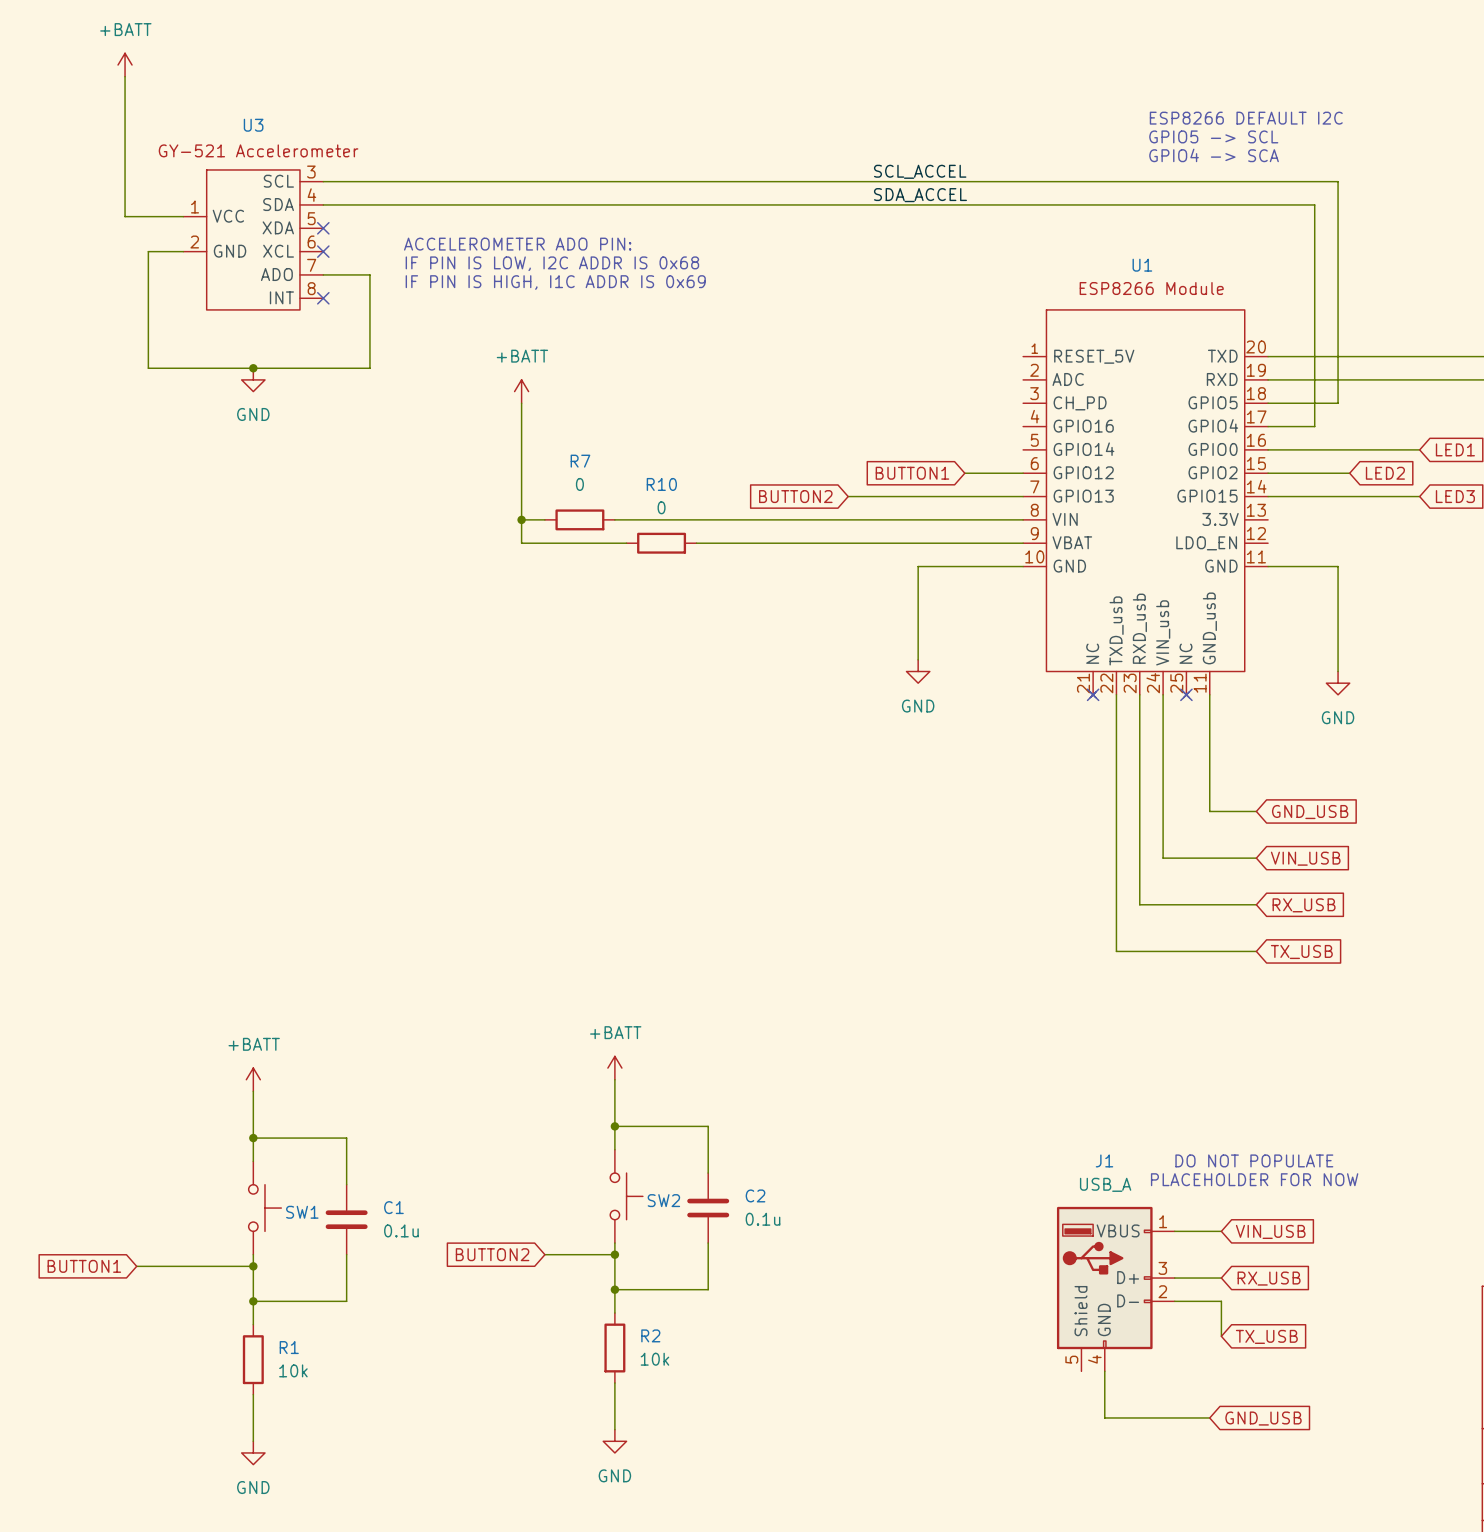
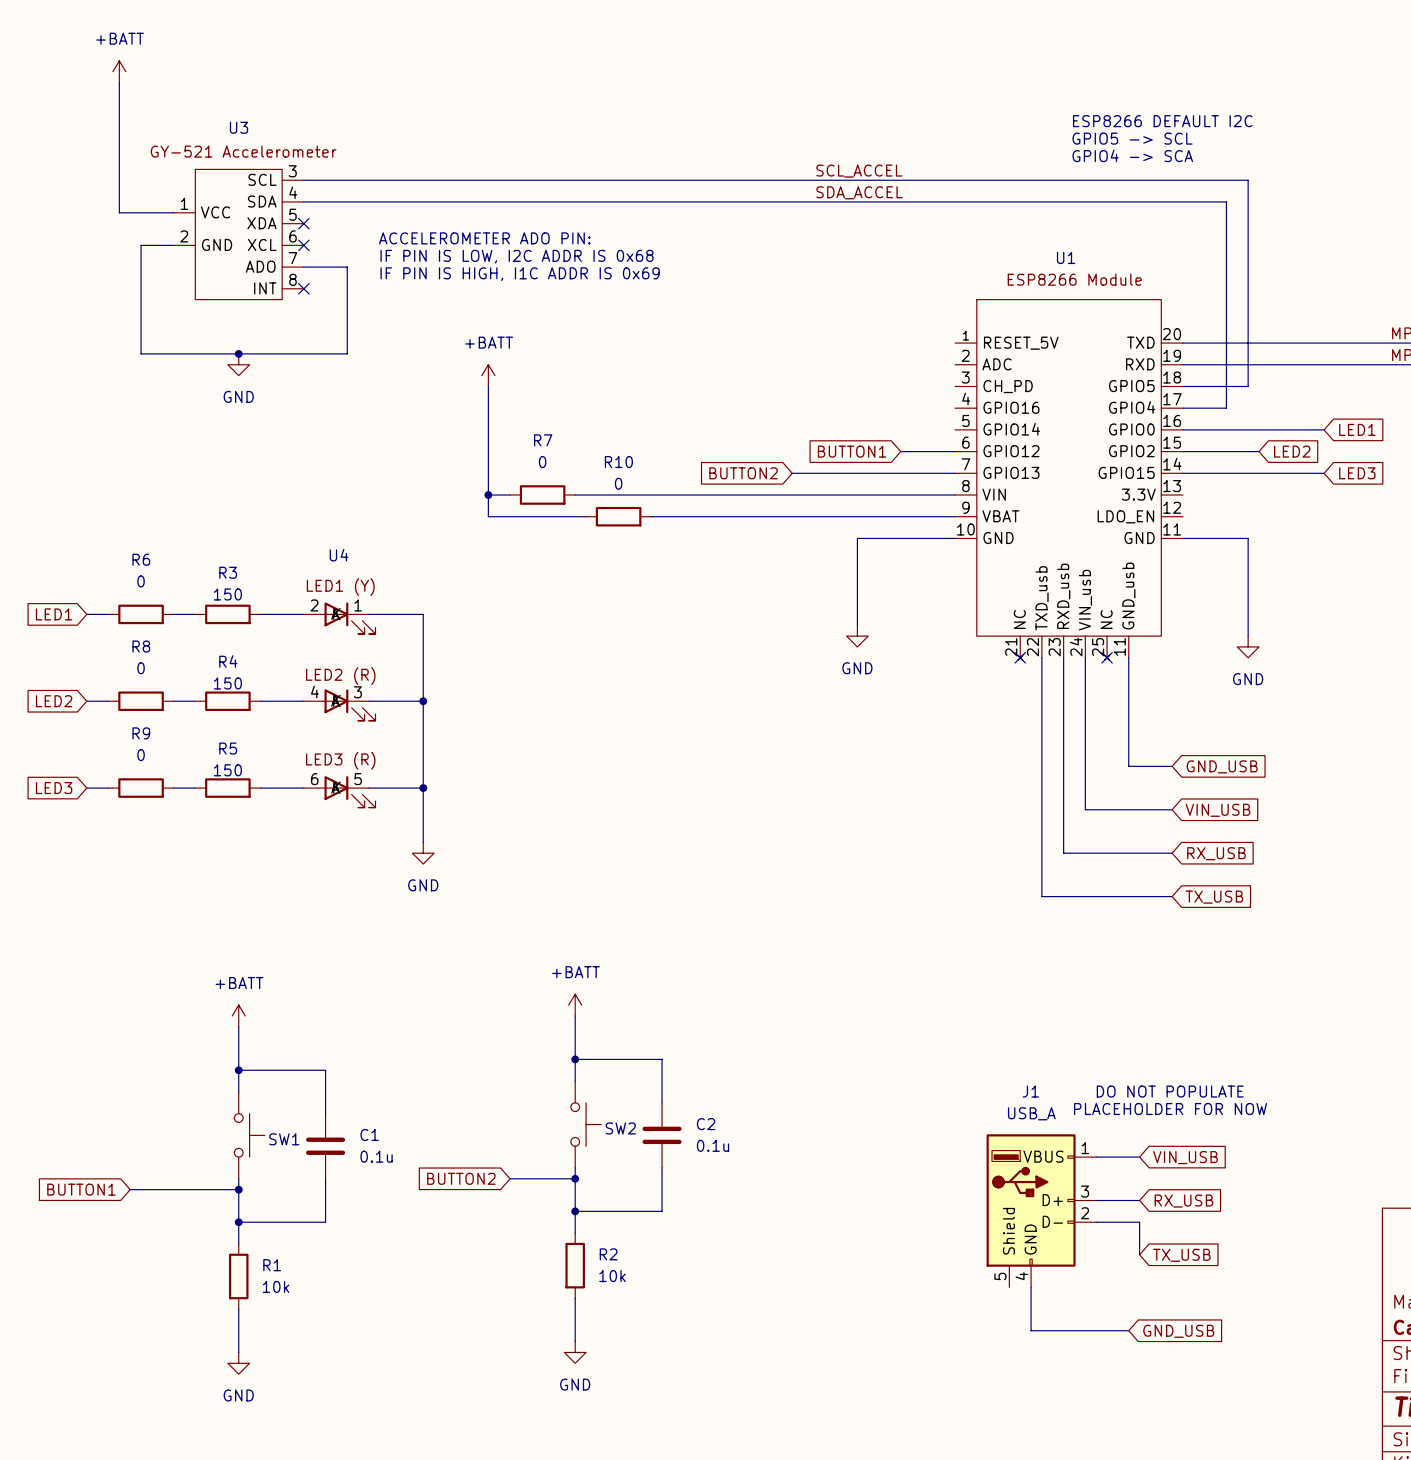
global label: none -> LED1 (54, 614)
wire: none -> (86, 614) (108, 614)
R6: none -> 0 (141, 614)
wire: none -> (173, 614) (195, 614)
R3: none -> 150 (227, 614)
wire: none -> (260, 614) (303, 614)
wire: none -> (368, 614) (423, 614) (423, 842)
global label: none -> LED2 (54, 701)
wire: none -> (86, 701) (108, 701)
R8: none -> 0 (141, 701)
wire: none -> (173, 701) (195, 701)
R4: none -> 150 (227, 701)
wire: none -> (260, 701) (303, 701)
wire: none -> (368, 701) (423, 701)
junction: none -> (423, 701)
U4: none -> (339, 705)
global label: none -> LED3 (54, 788)
wire: none -> (86, 788) (108, 788)
R9: none -> 0 (141, 788)
wire: none -> (173, 788) (195, 788)
R5: none -> 150 (227, 788)
wire: none -> (260, 788) (303, 788)
wire: none -> (368, 788) (423, 788)
junction: none -> (423, 788)
power symbol: none -> GND (423, 853)

